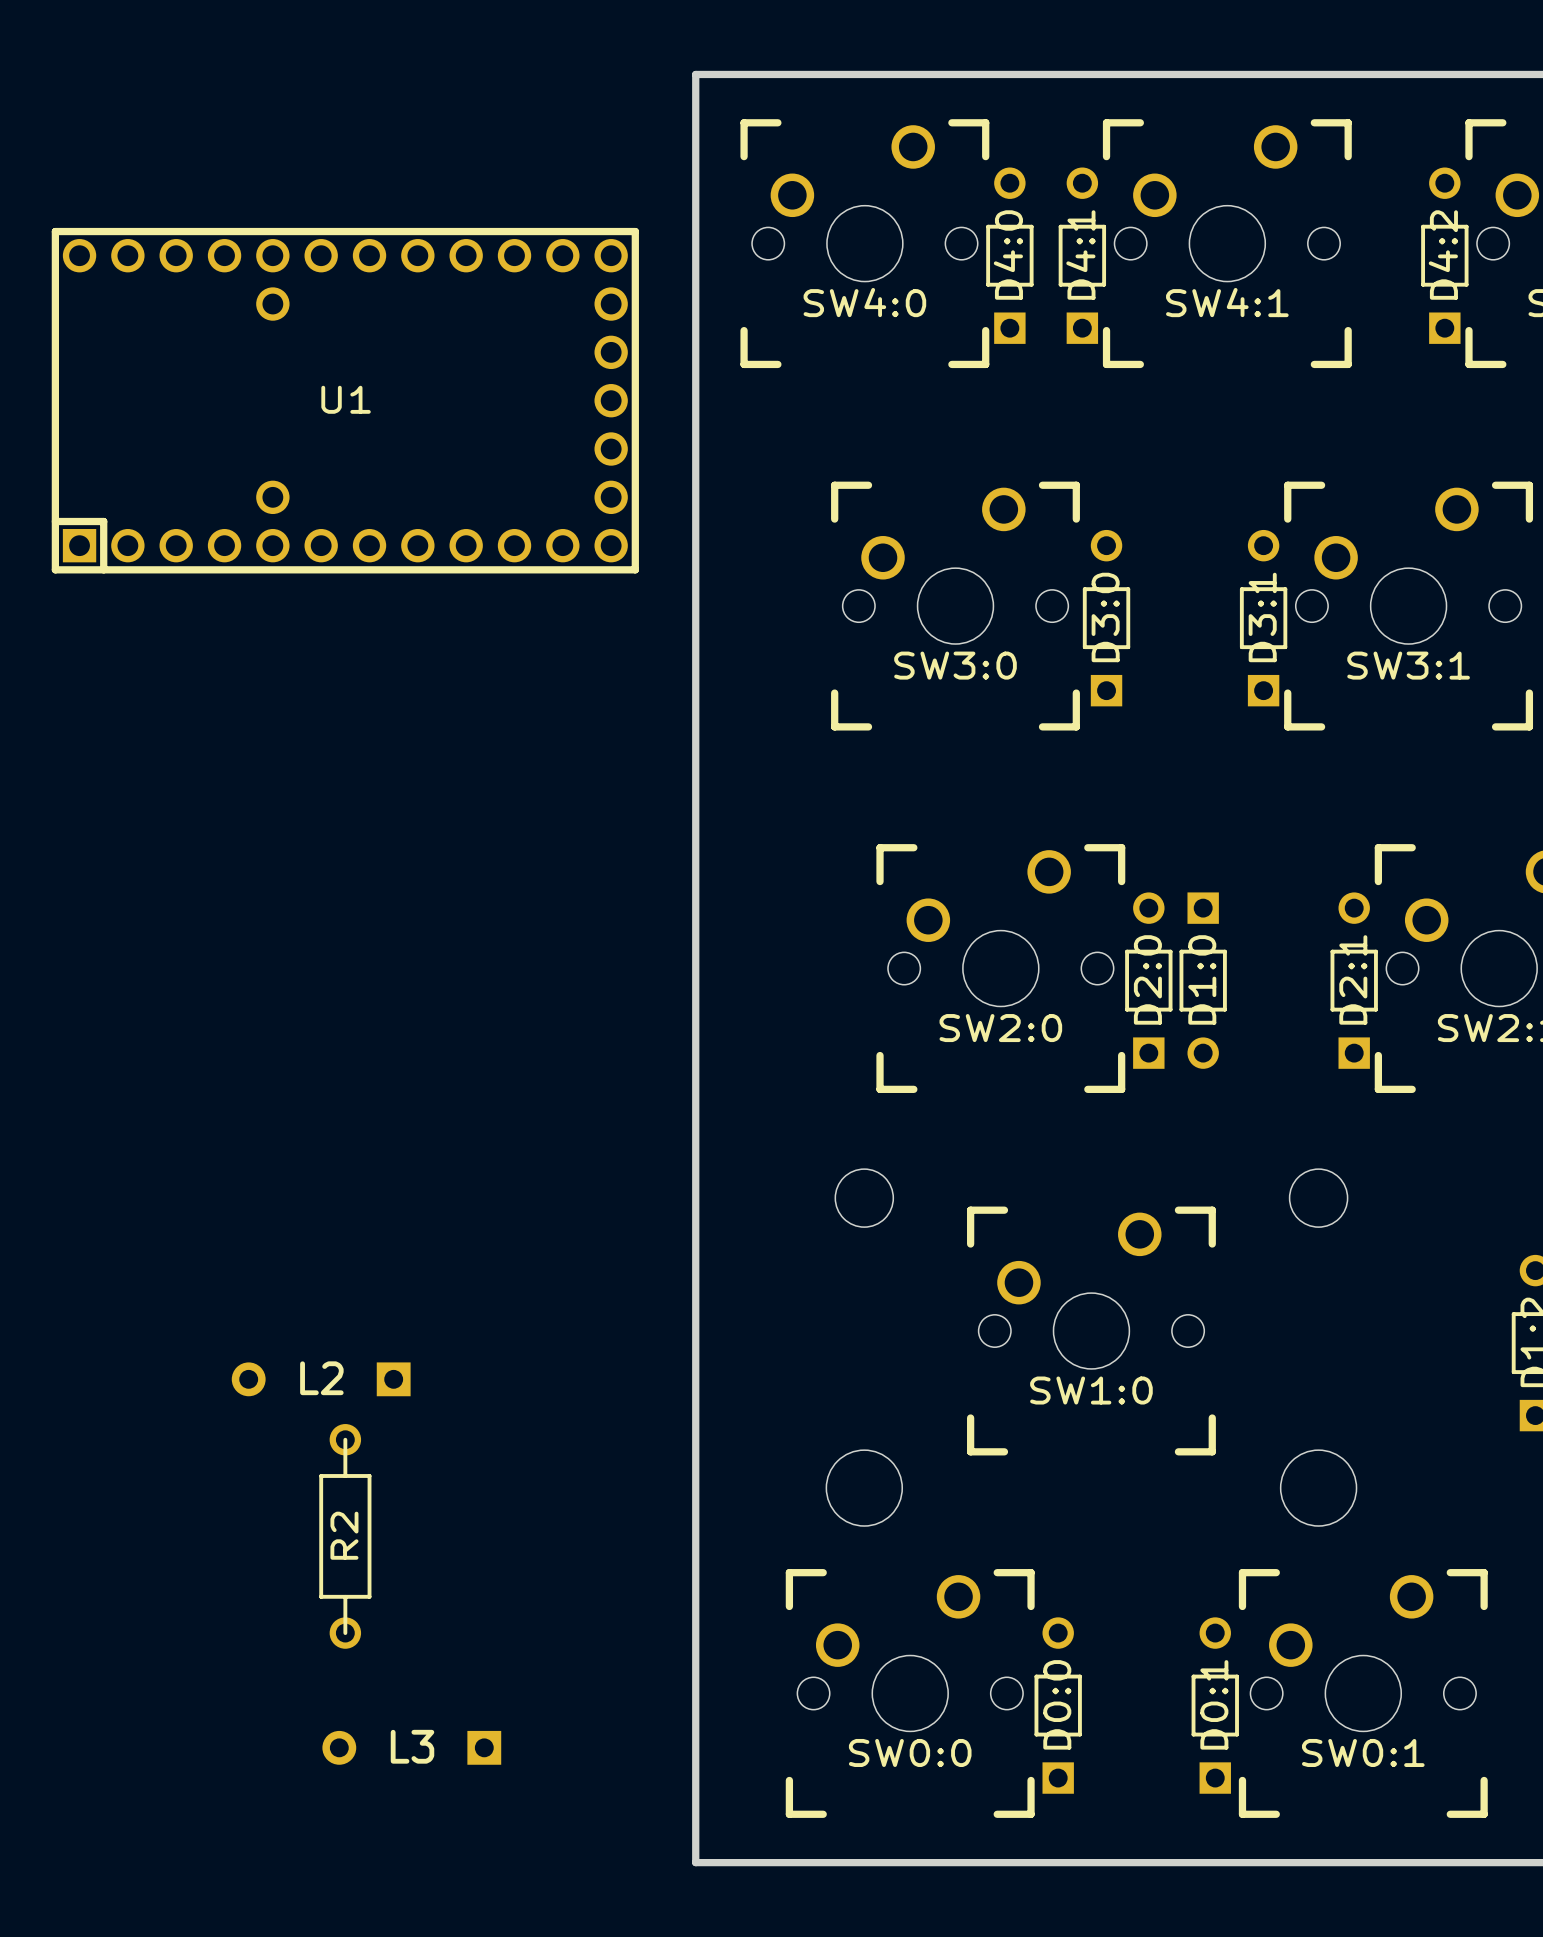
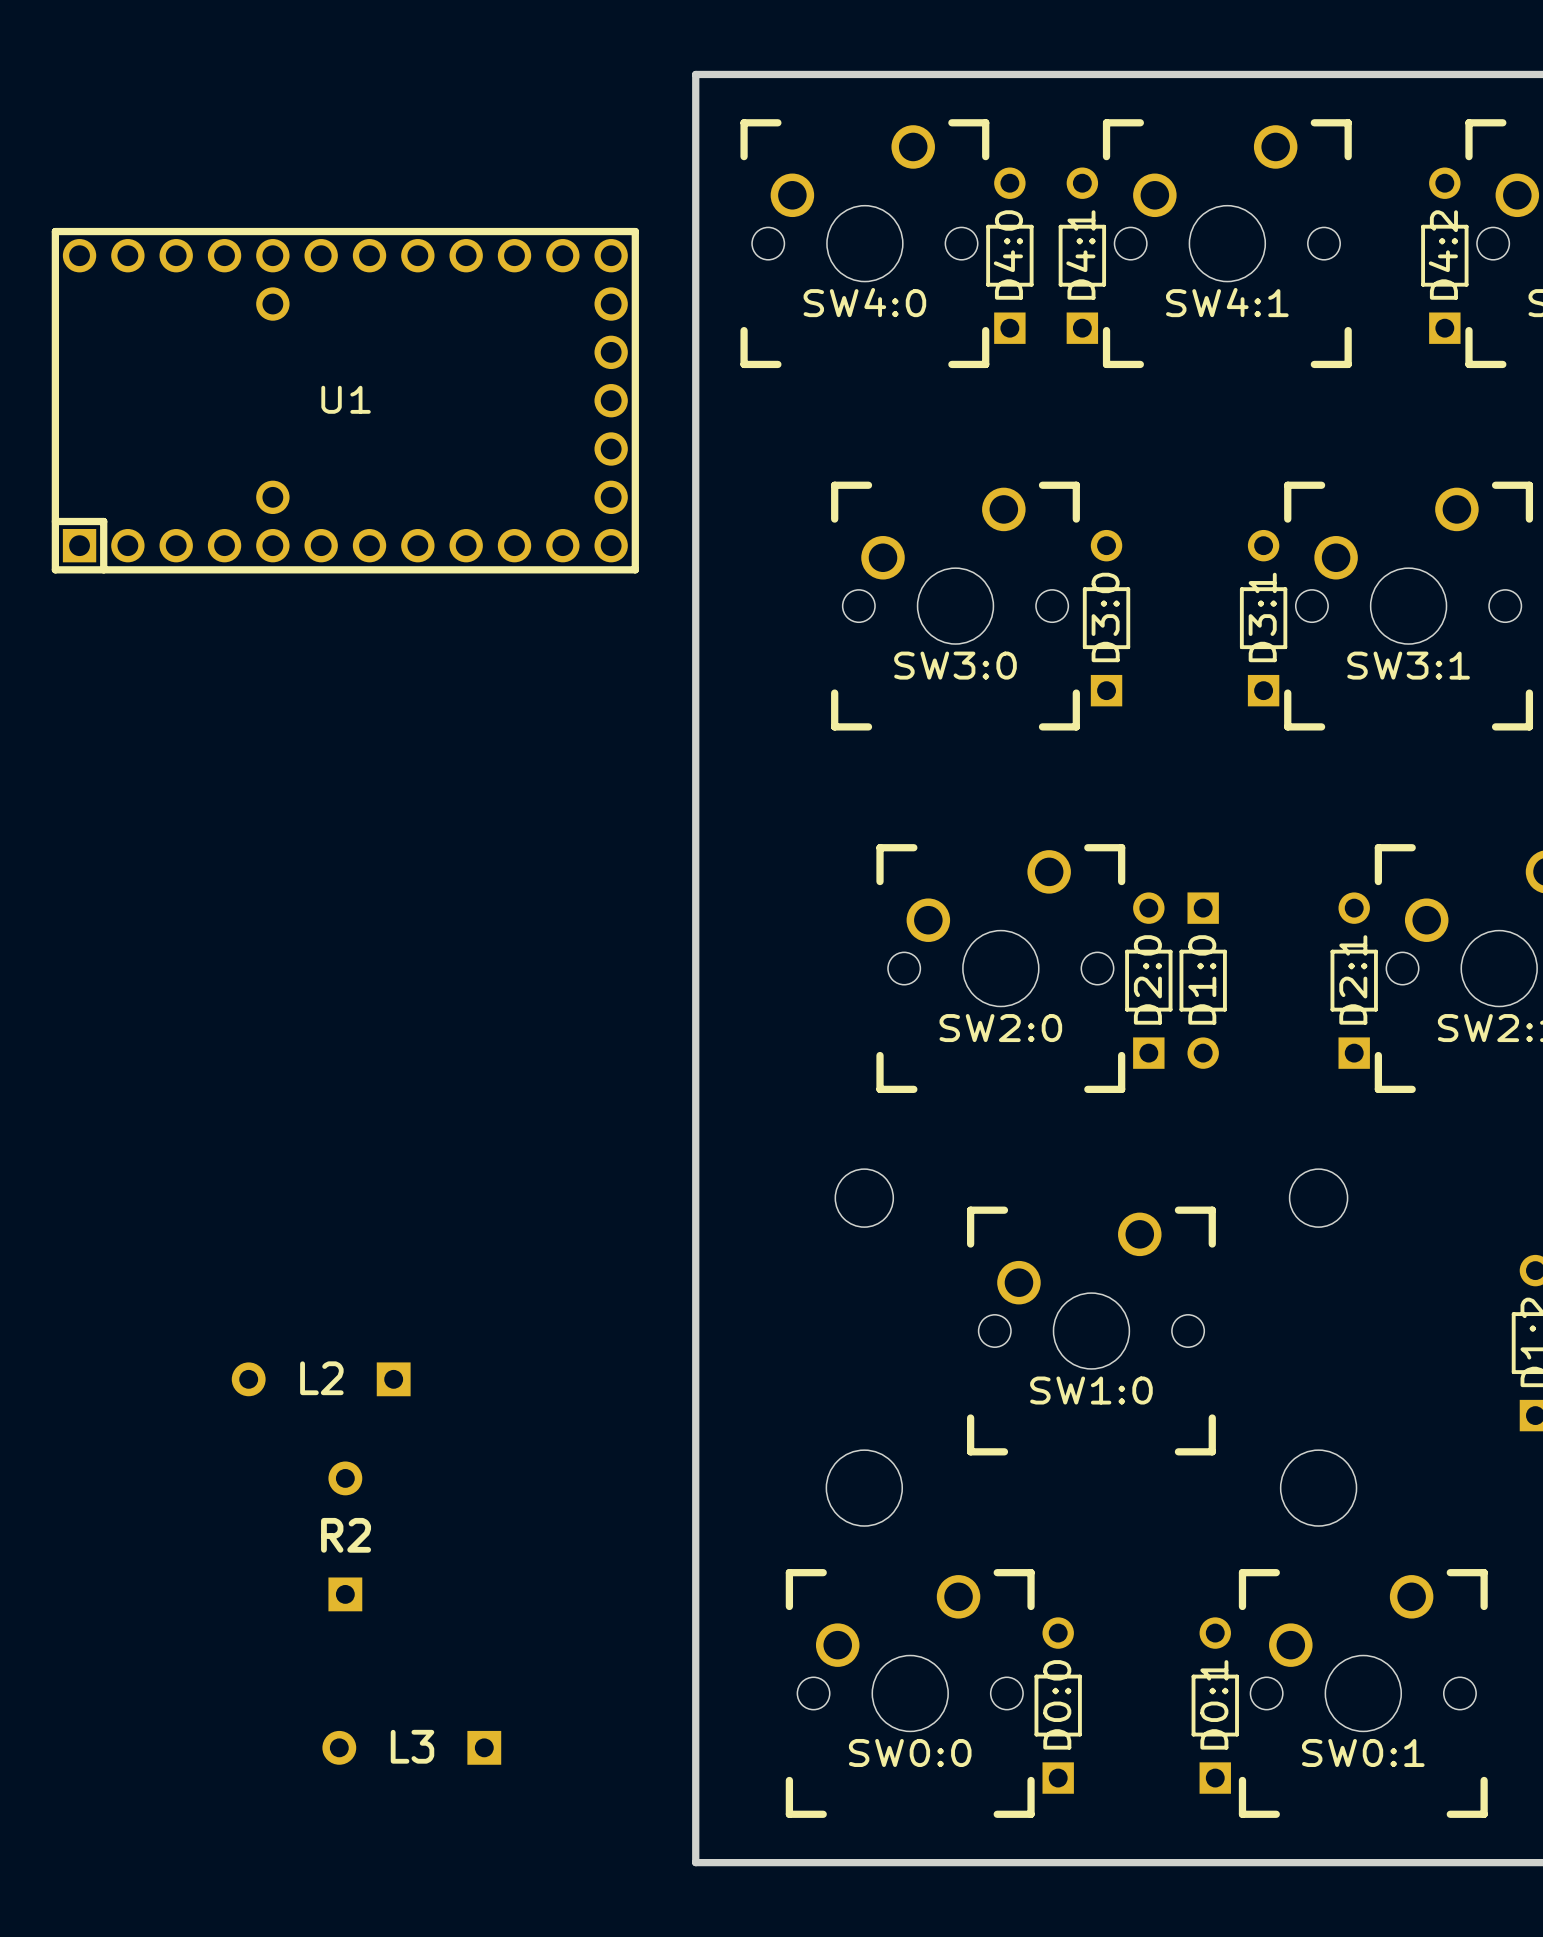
R2 footprint: [319, 1424, 372, 1649] -> [328, 1461, 363, 1612]

